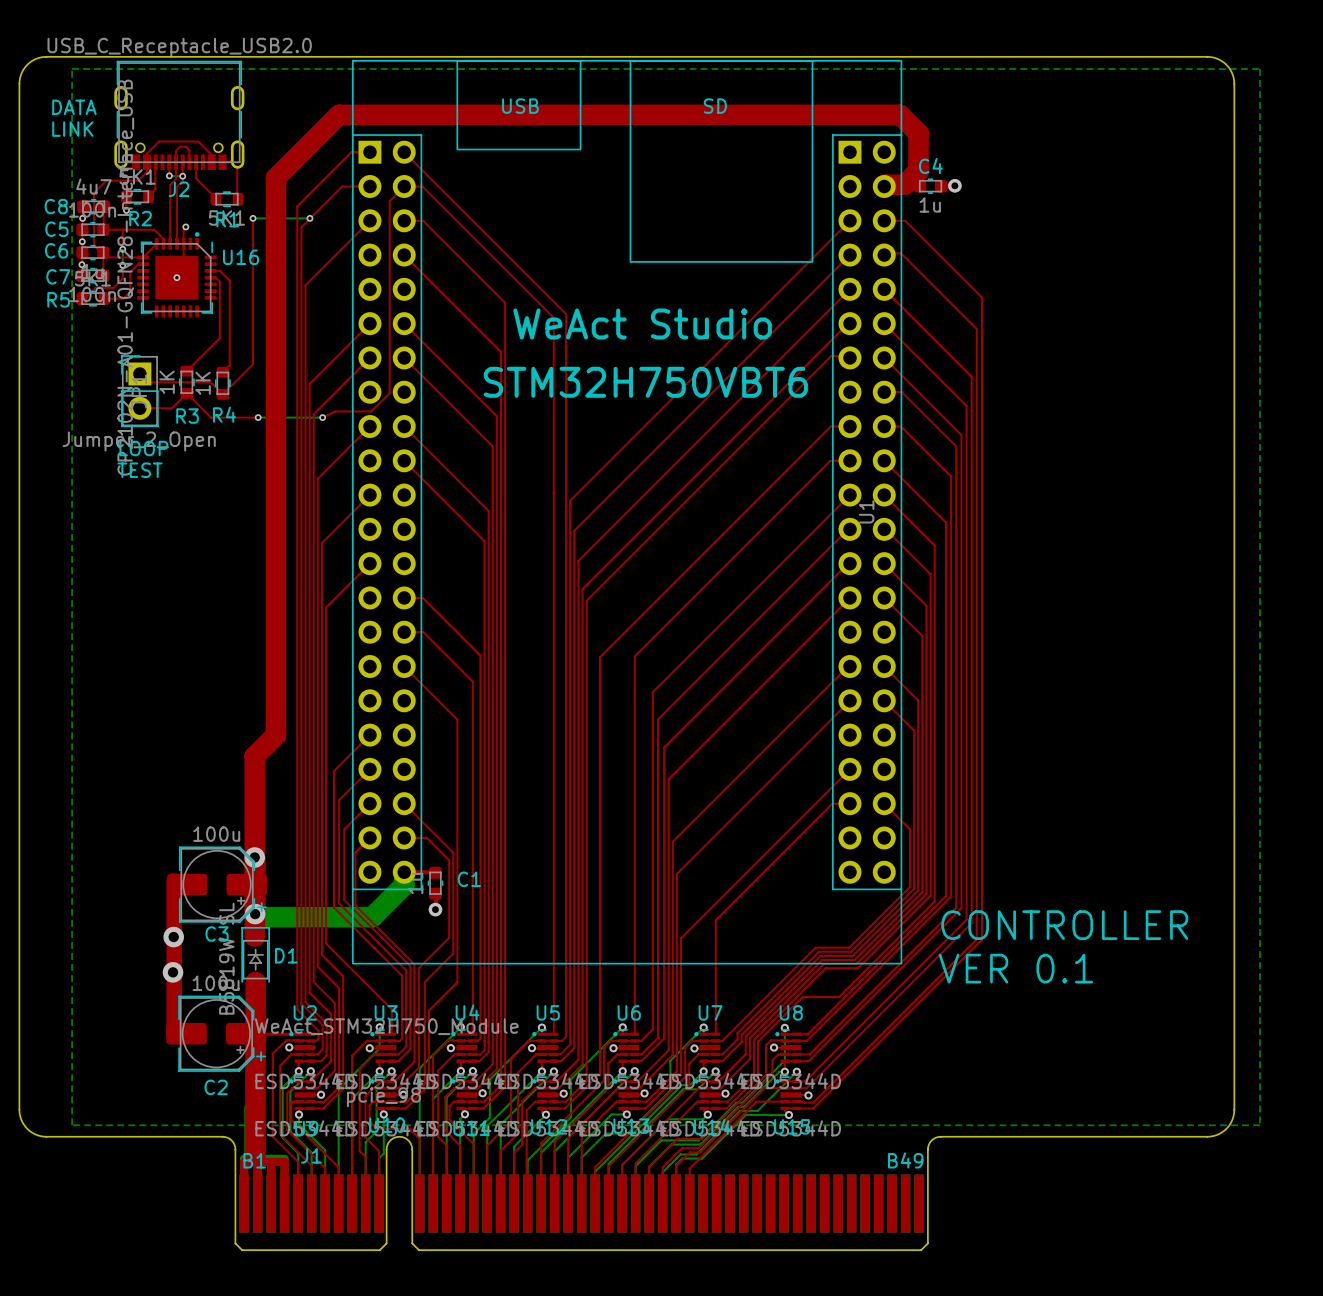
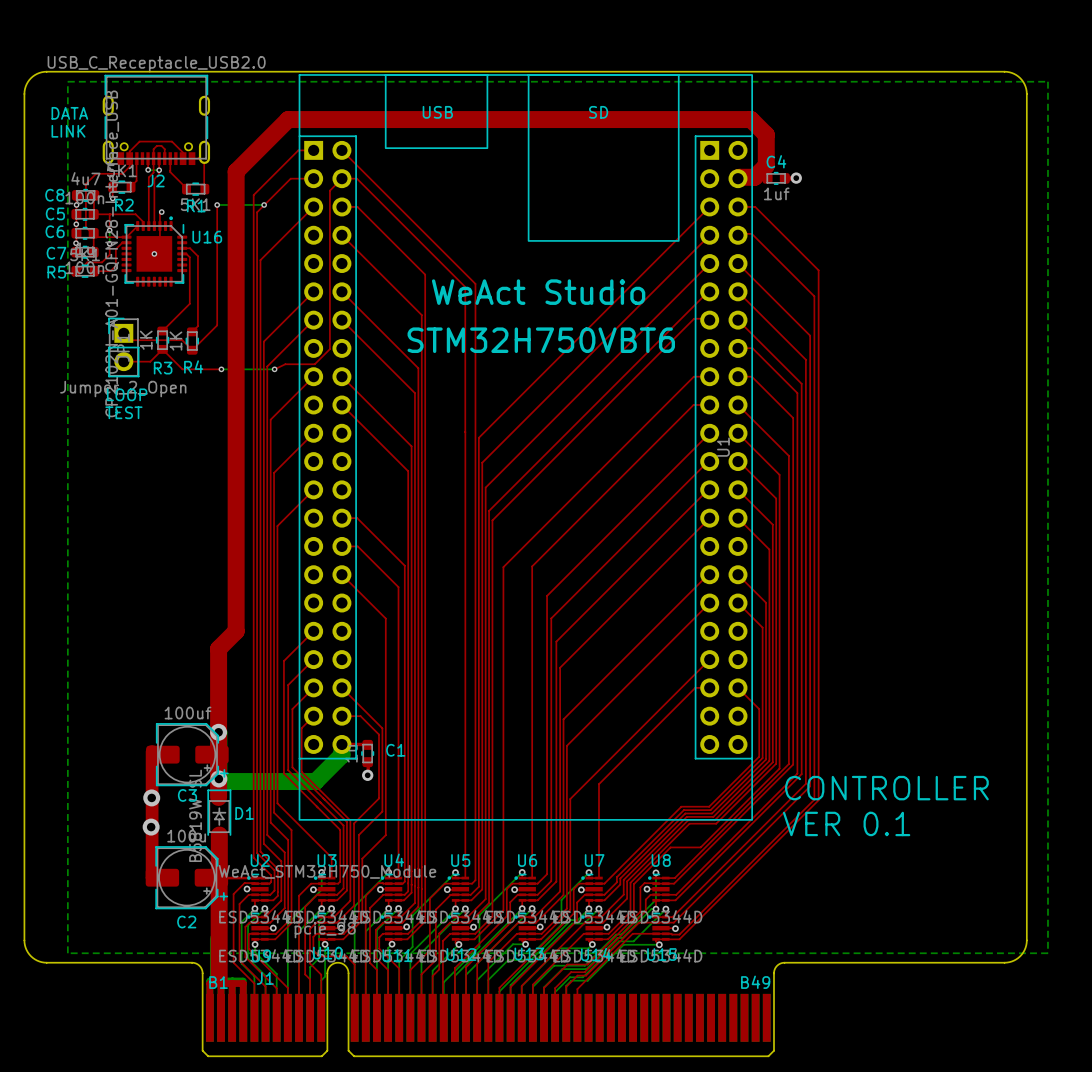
C4 value: 1u (930, 204) -> 1uf (776, 193)
C3 value: 100u (216, 834) -> 100uf (188, 713)

